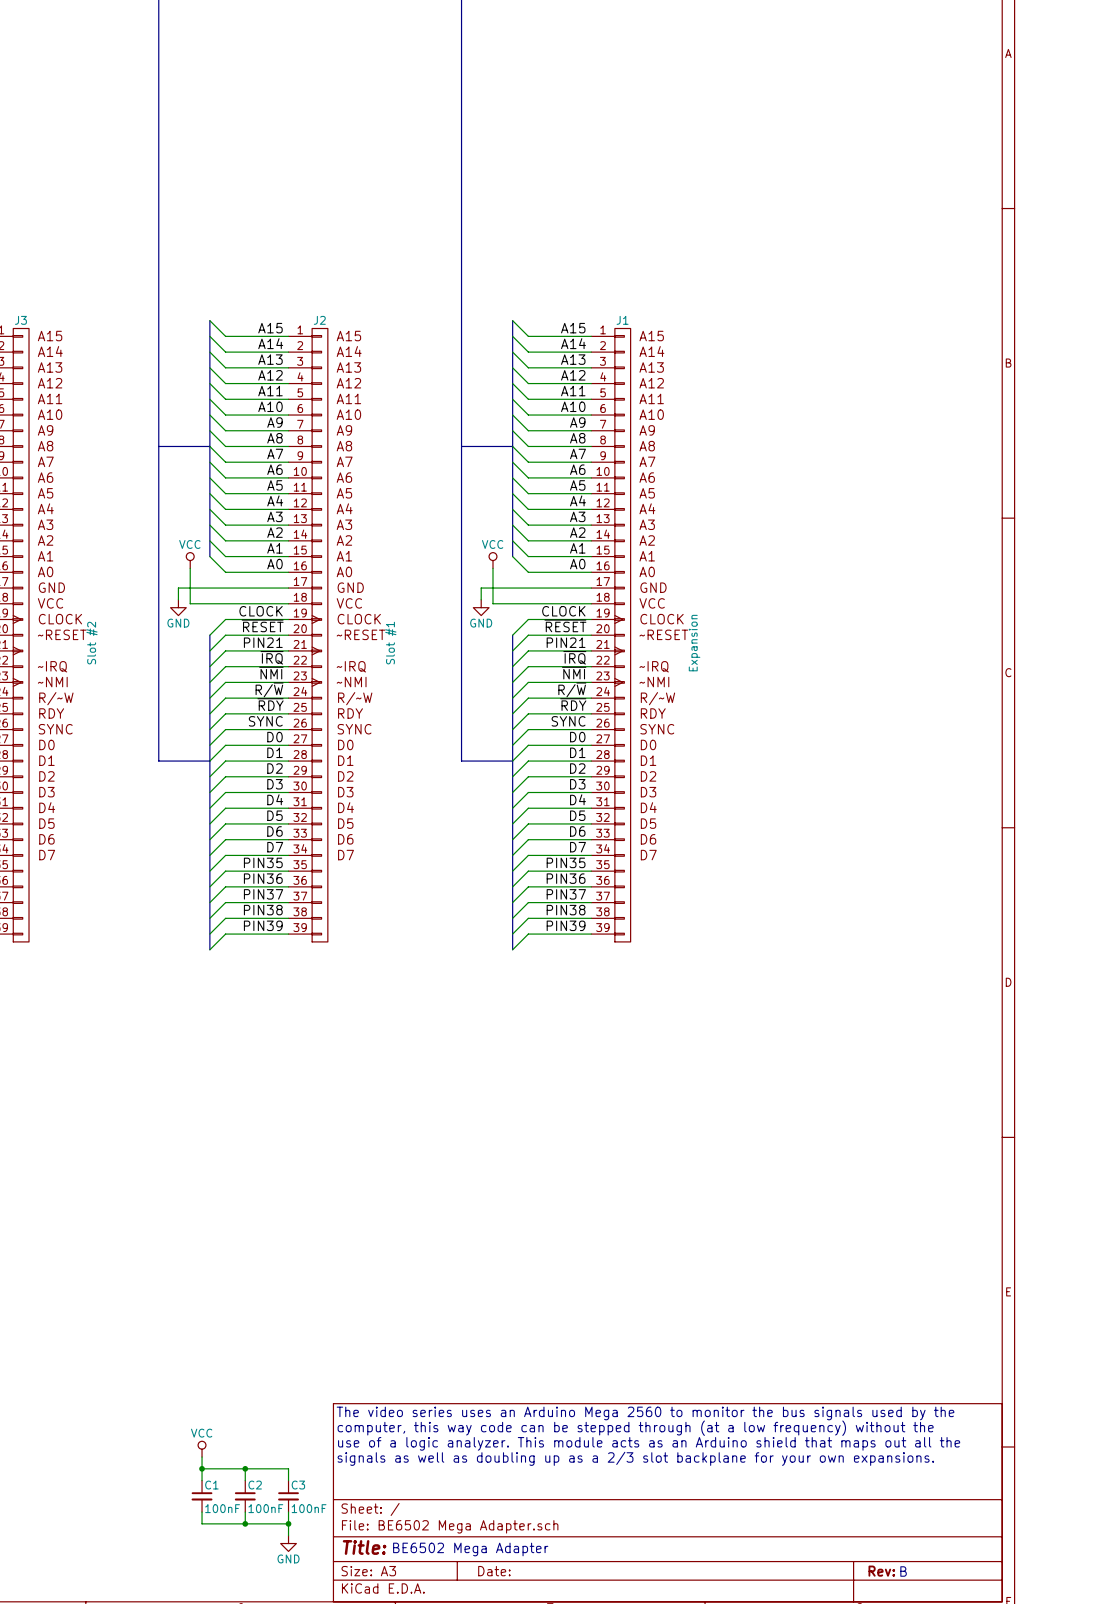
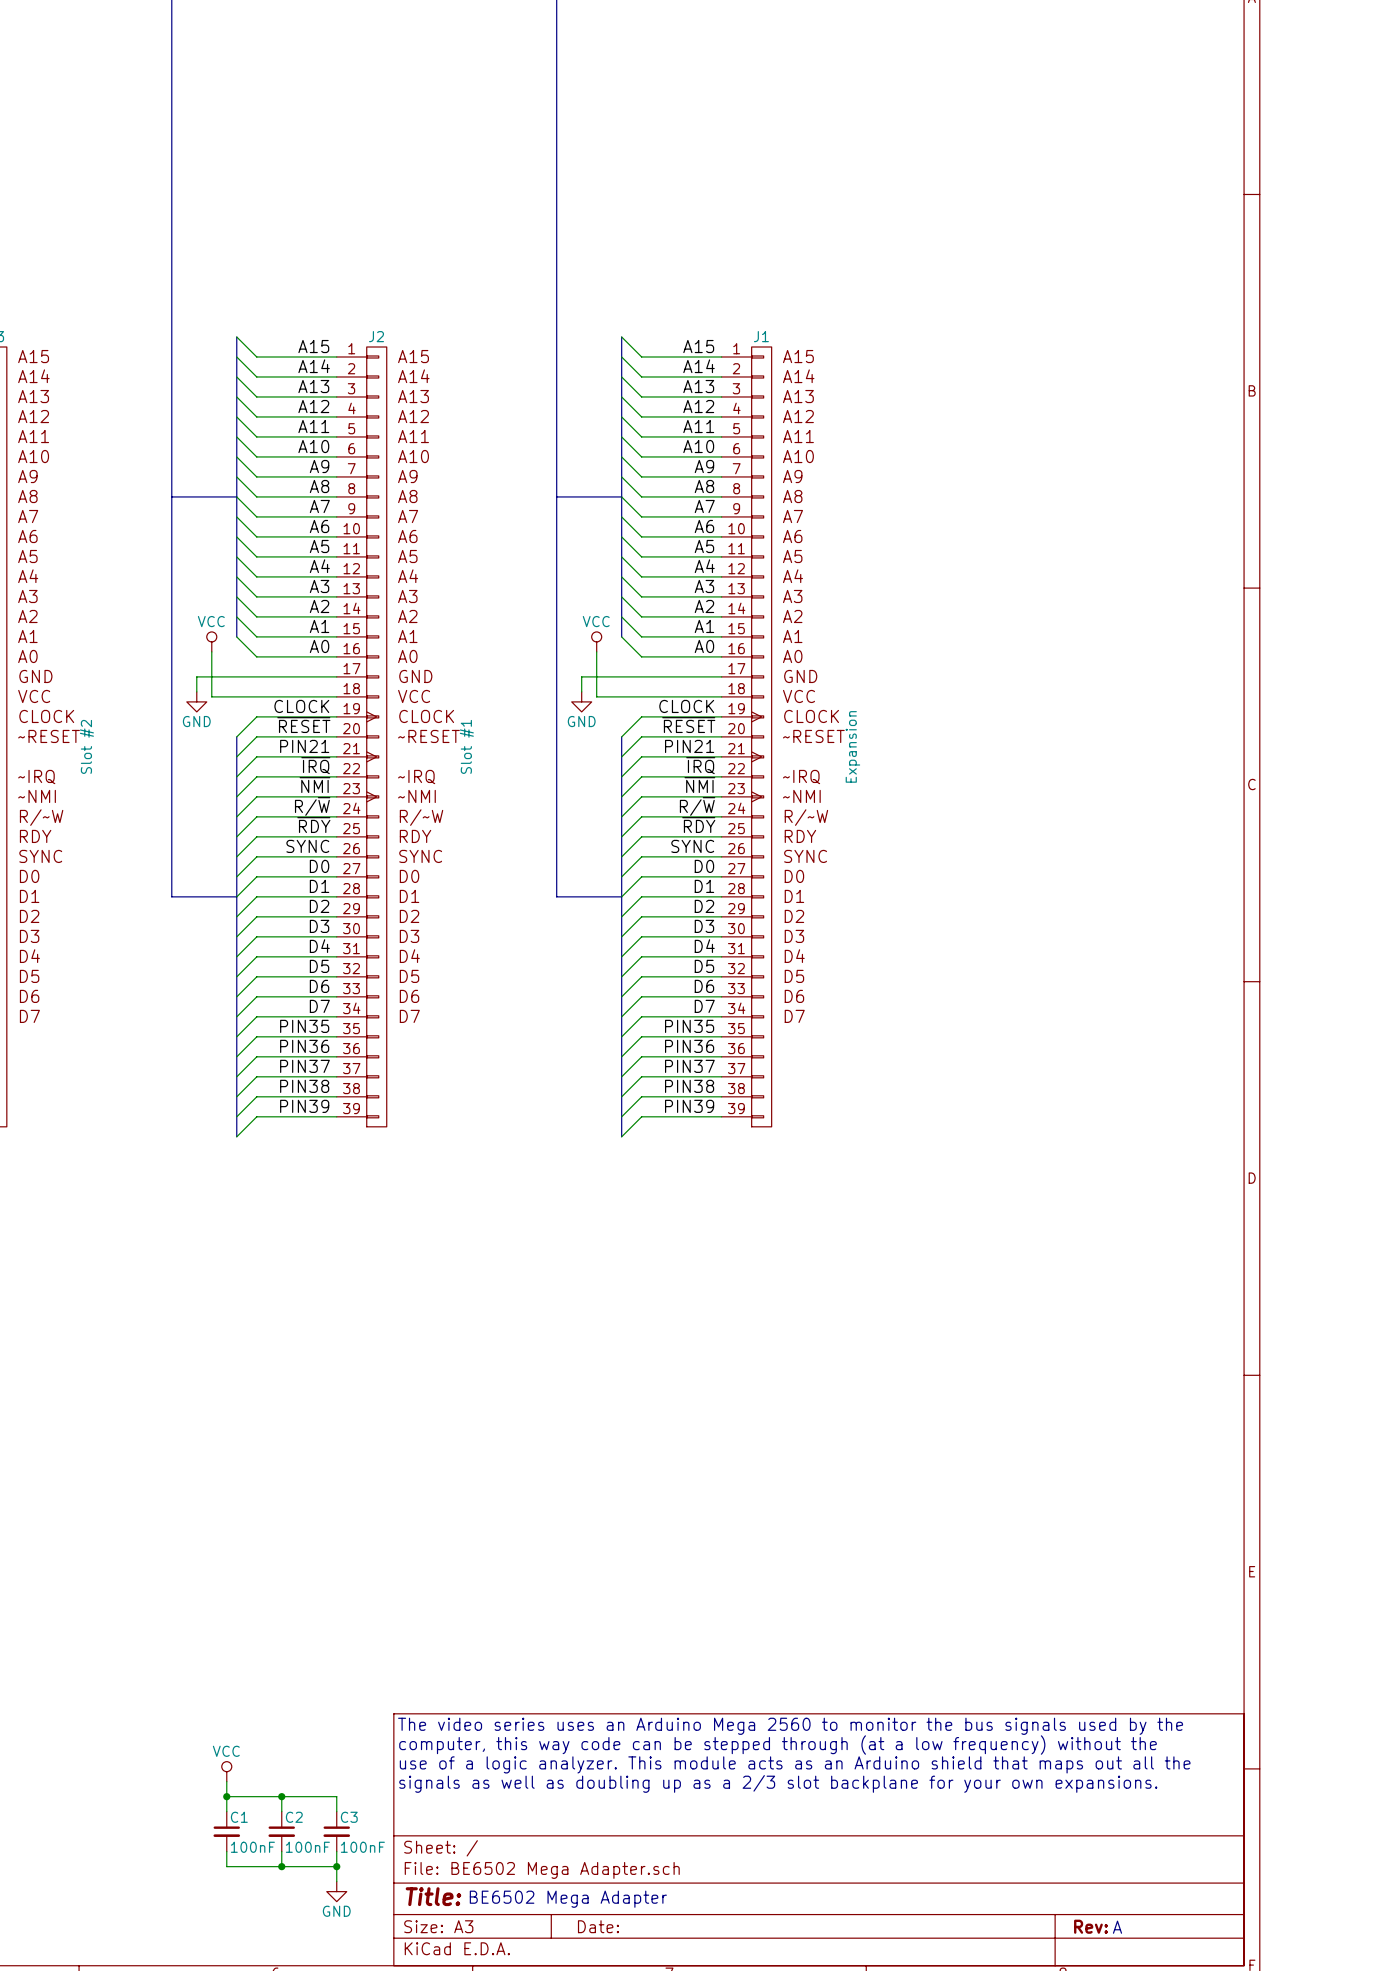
text: B (903, 1571) -> A (1117, 1927)

